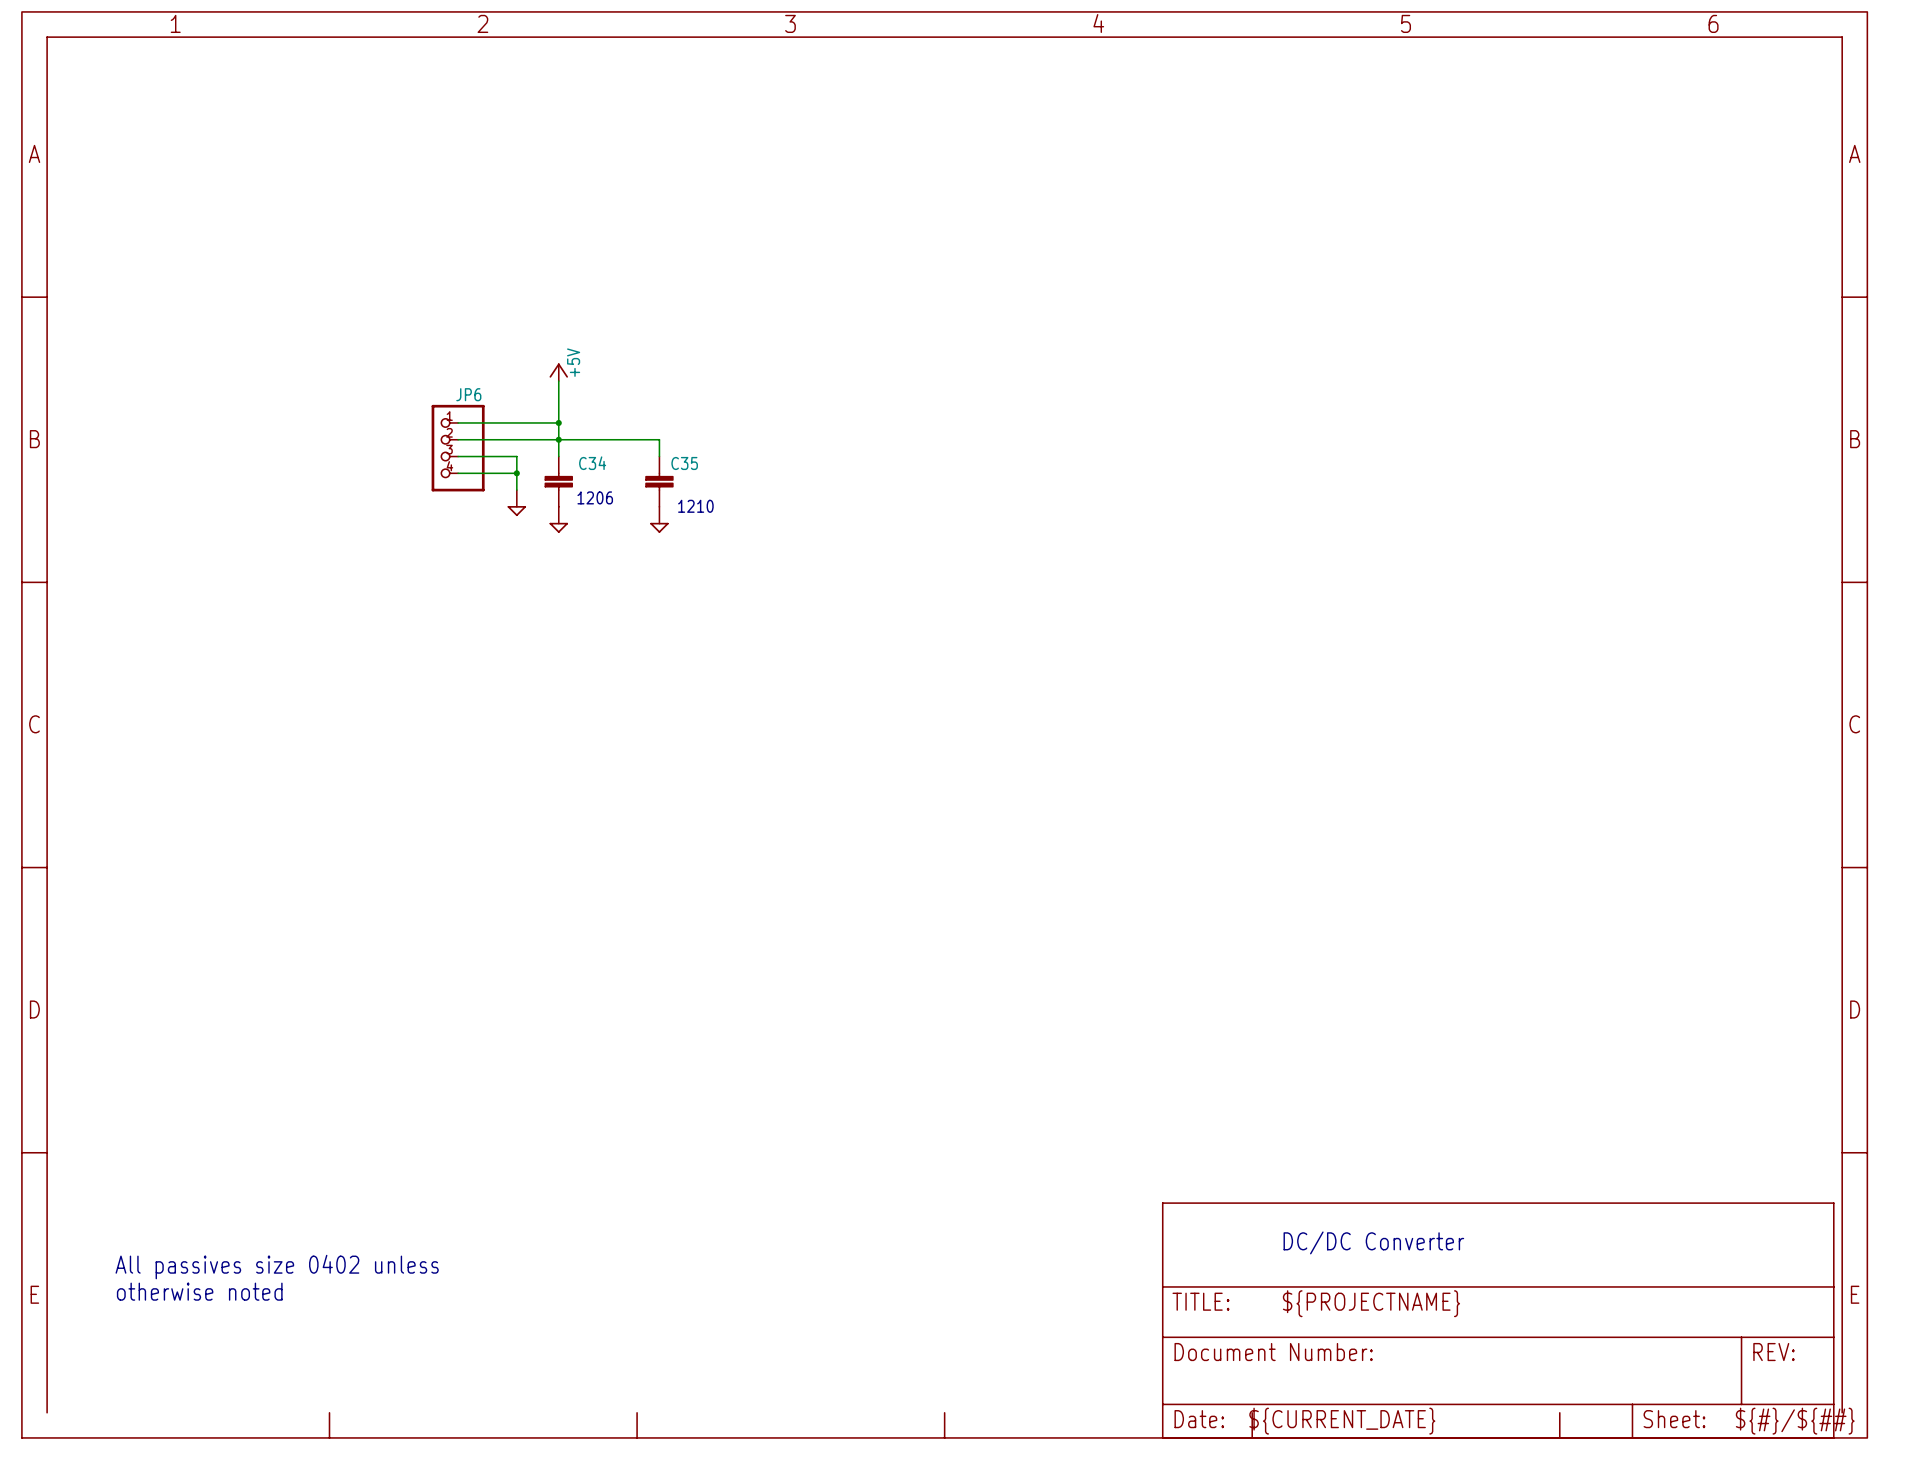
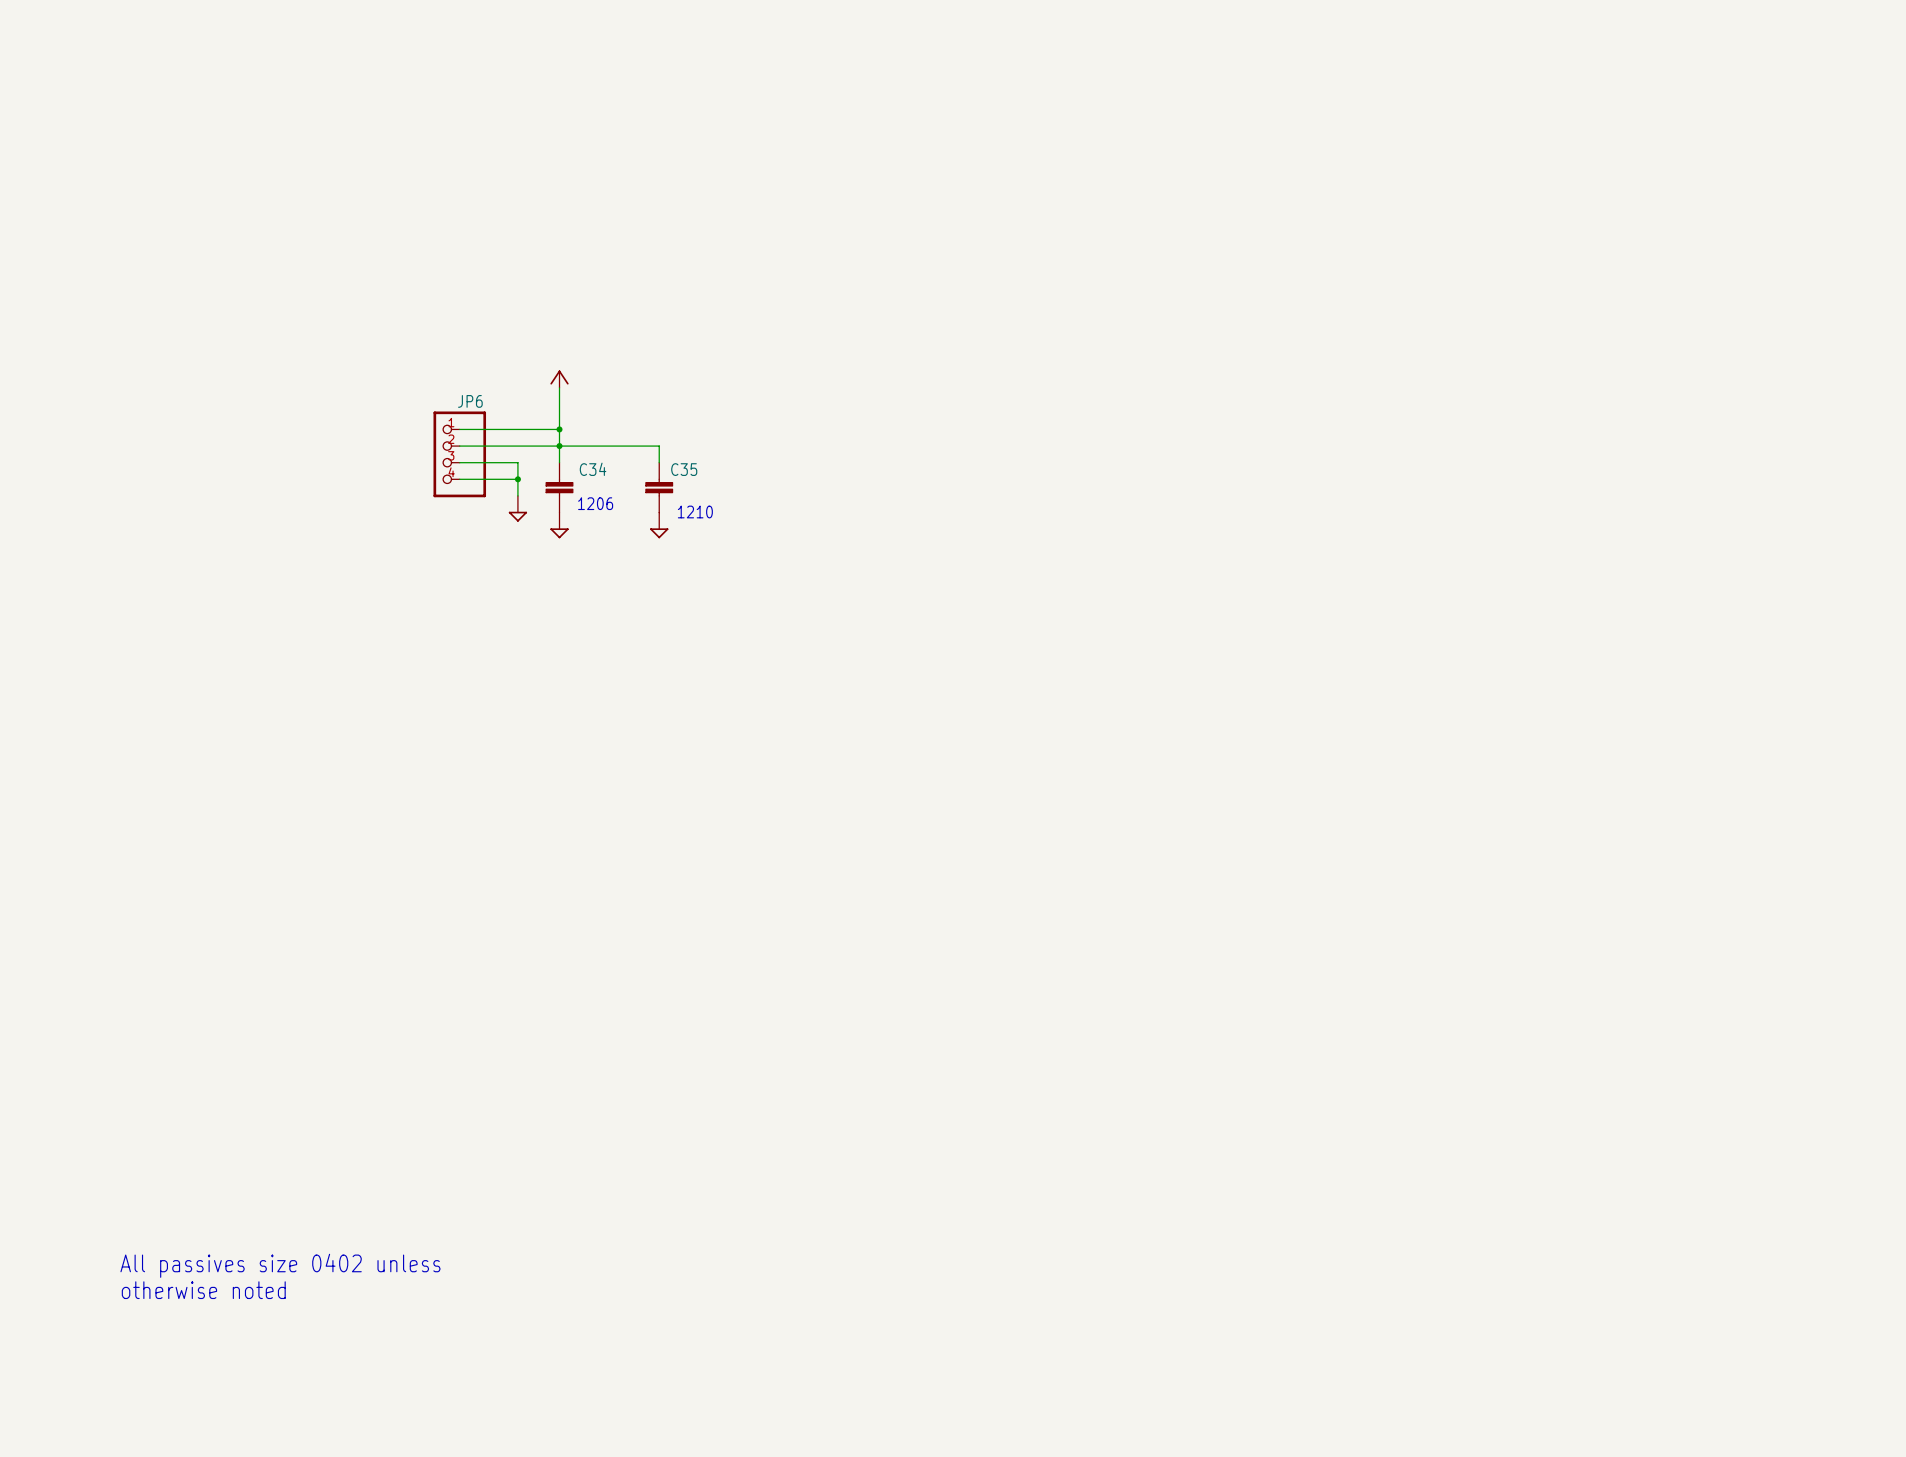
power symbol text: +5V (573, 362) -> none
power symbol: (944, 724) -> none
text: DC/DC Converter (1373, 1242) -> none
power symbol: (1498, 1320) -> none

